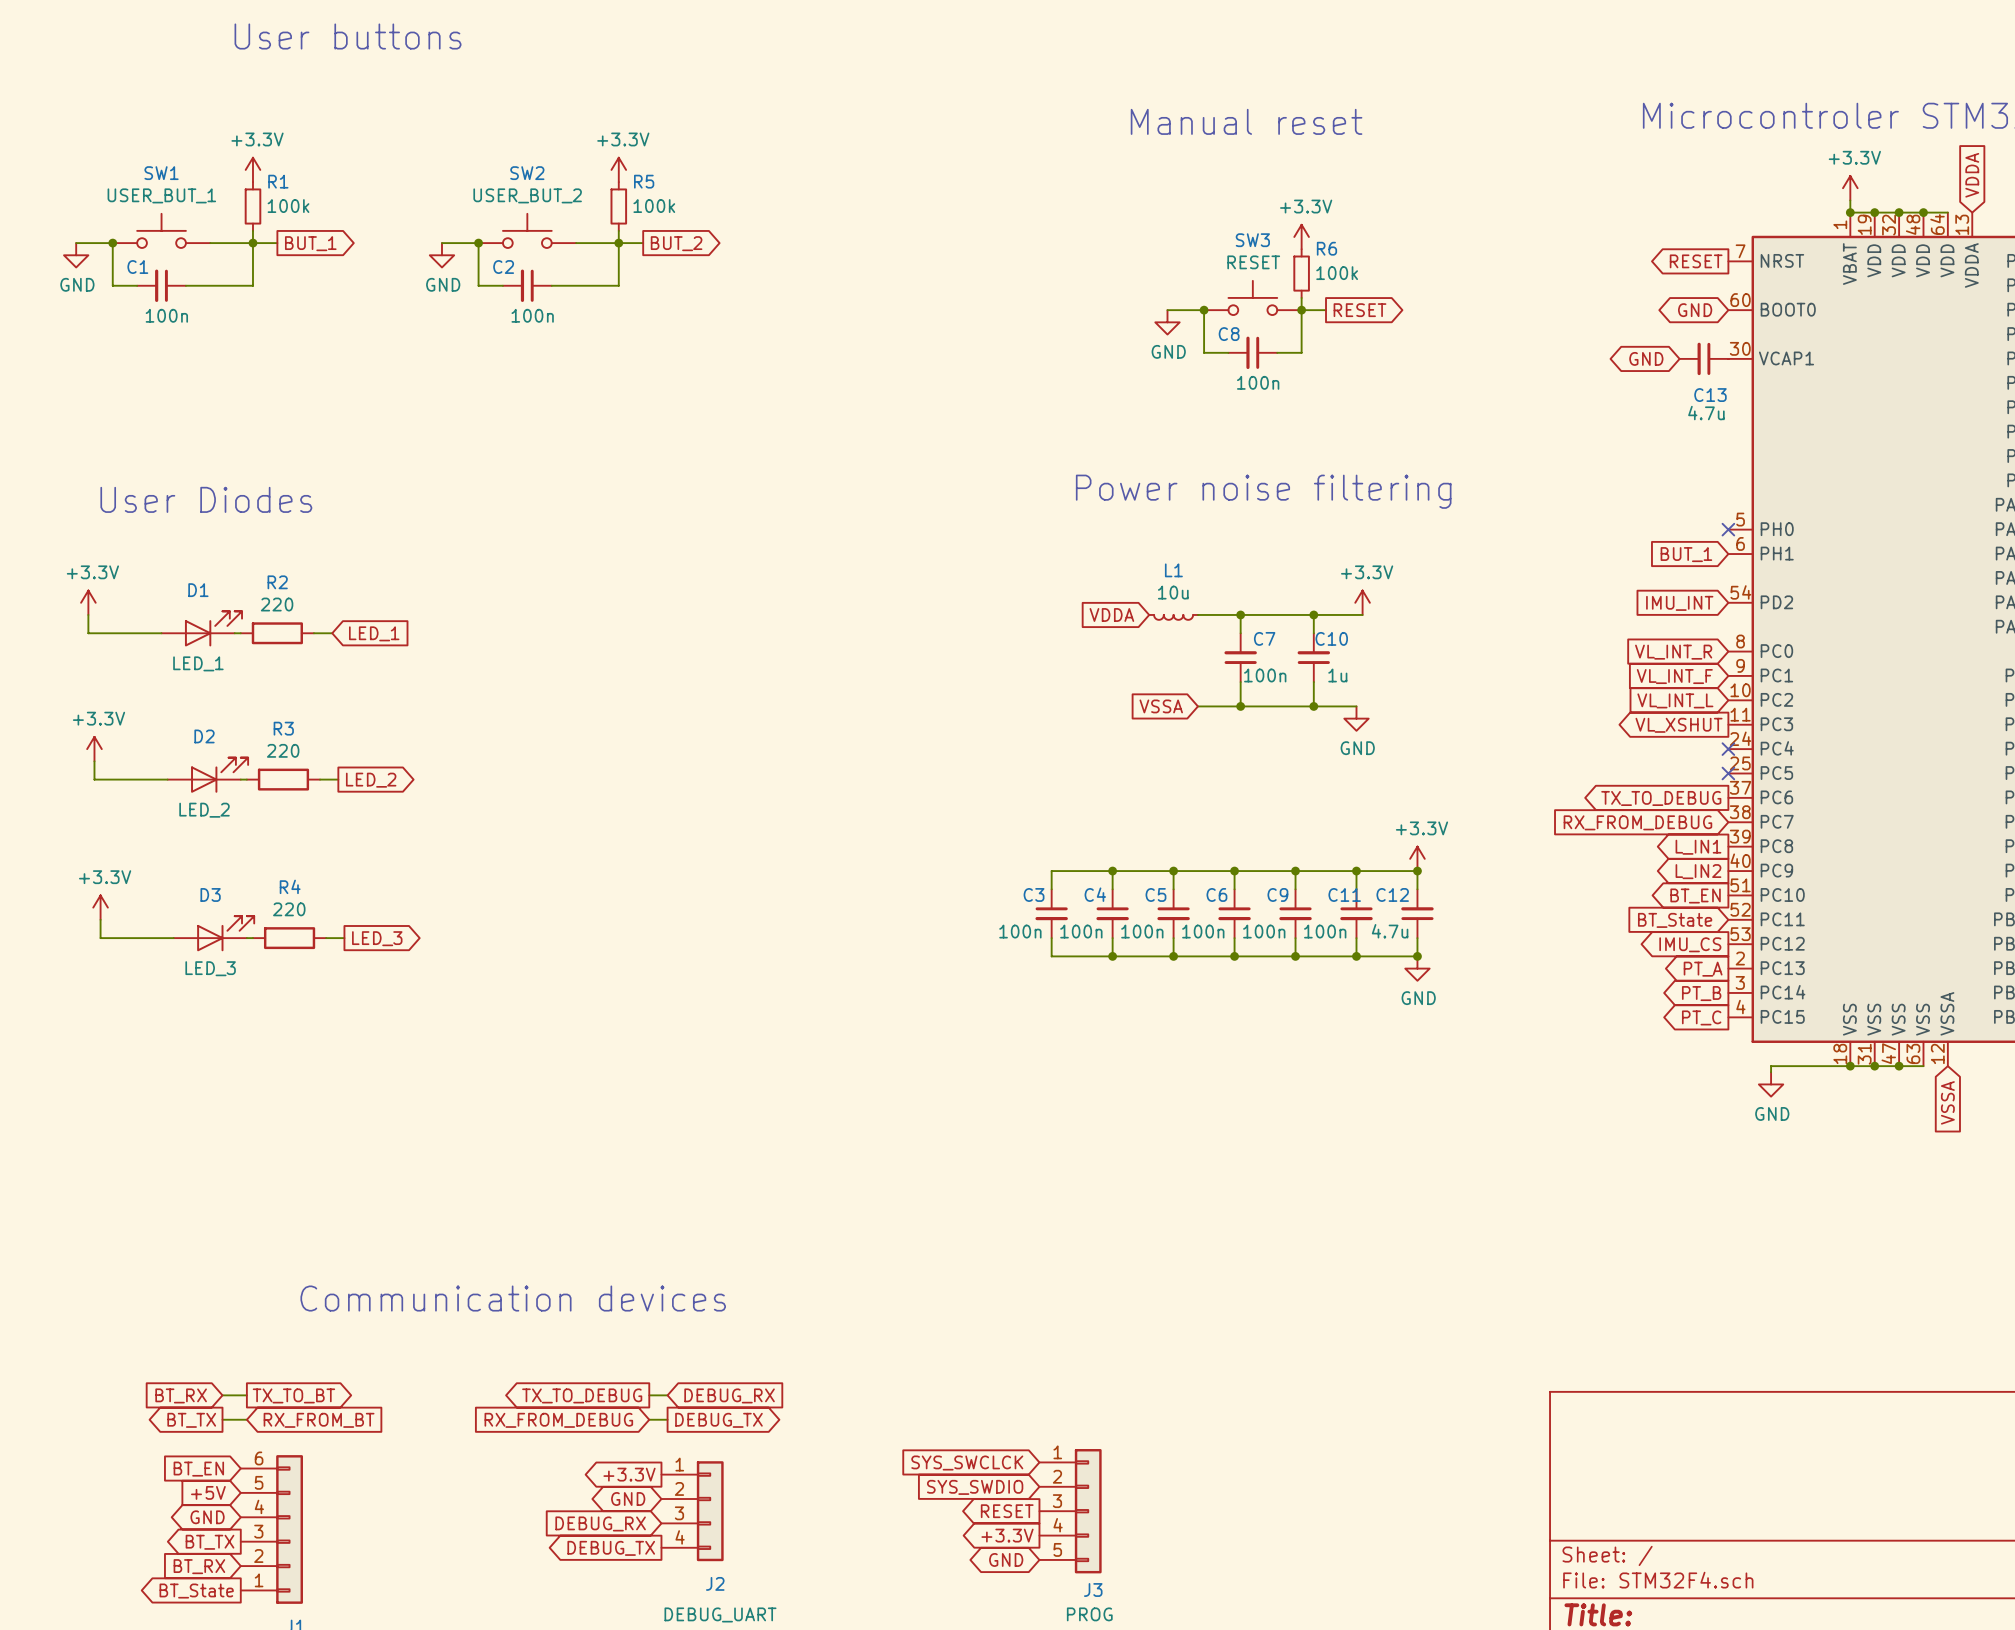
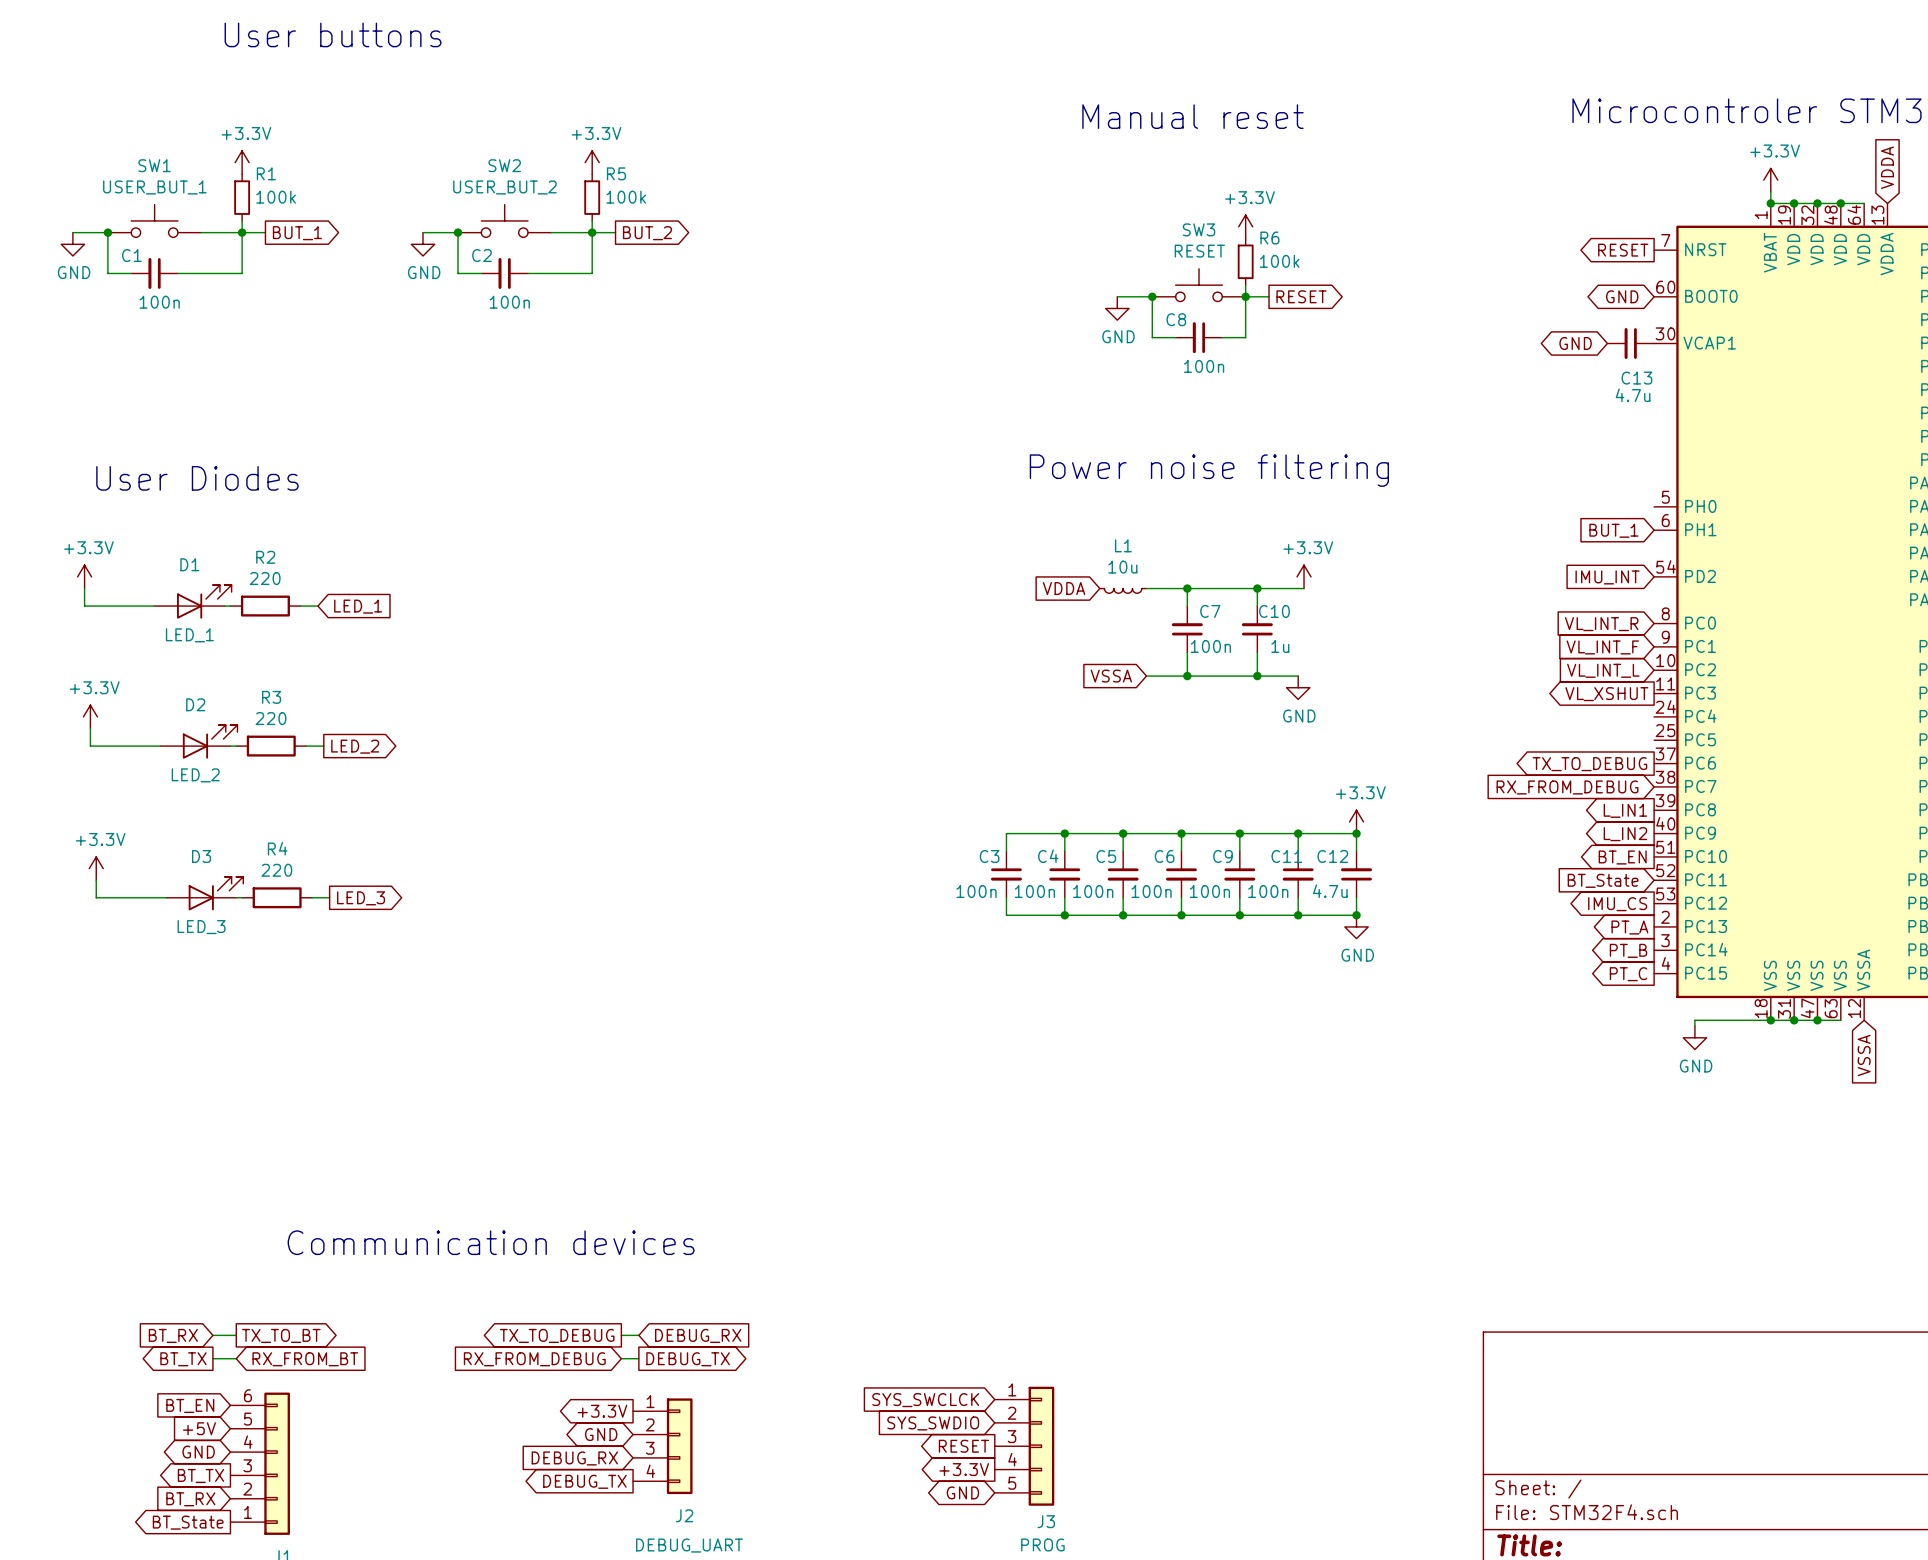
no-connect mark: (1728, 529) -> none
no-connect mark: (1728, 749) -> none
no-connect mark: (1728, 773) -> none

